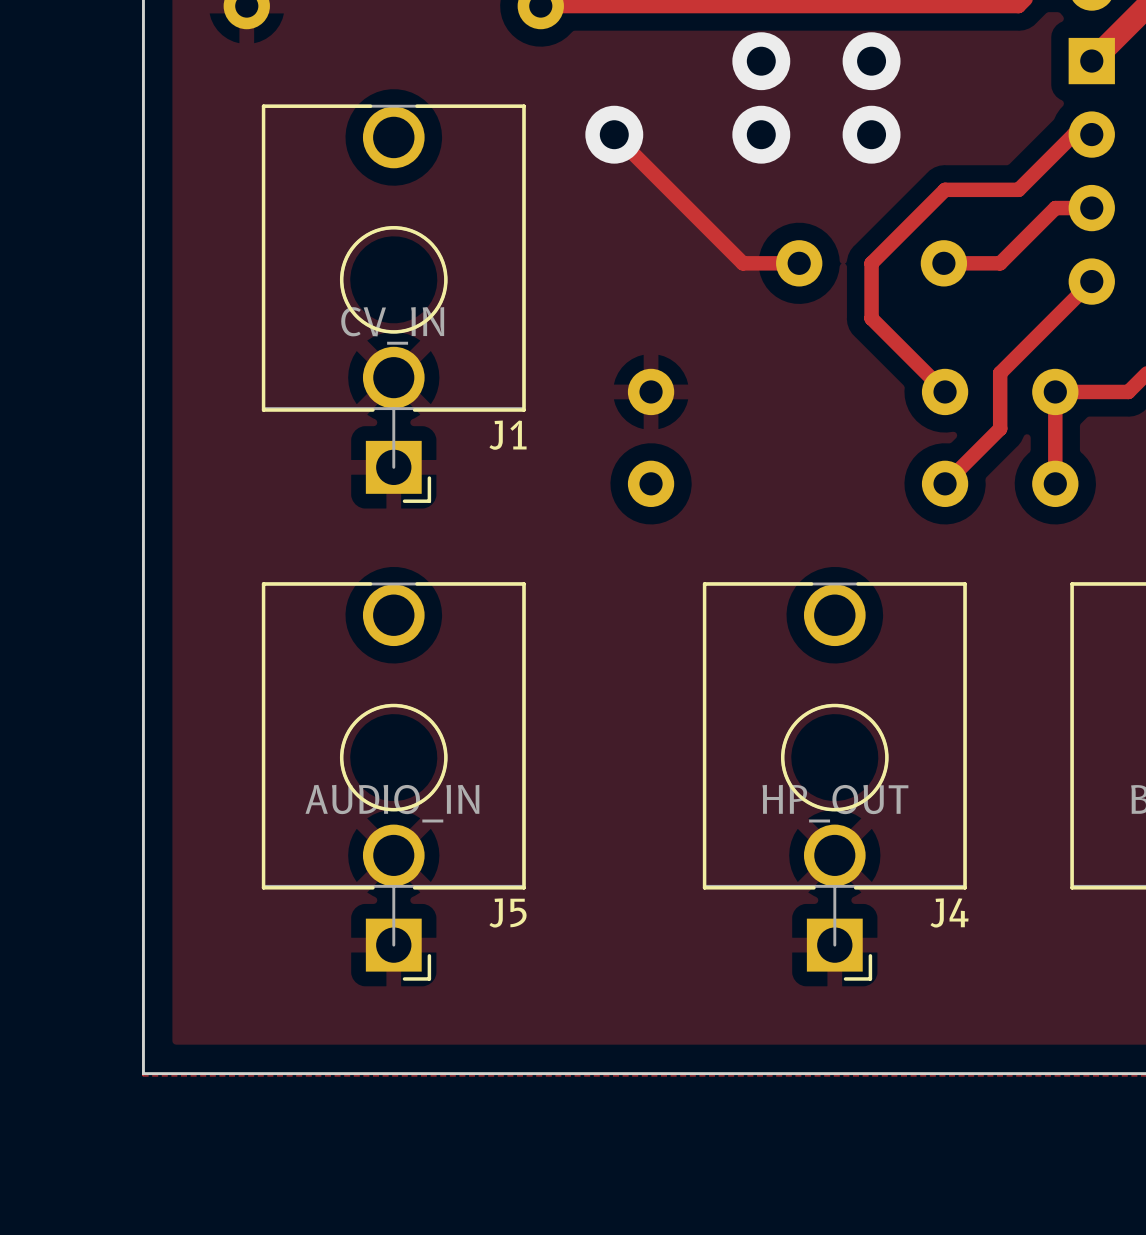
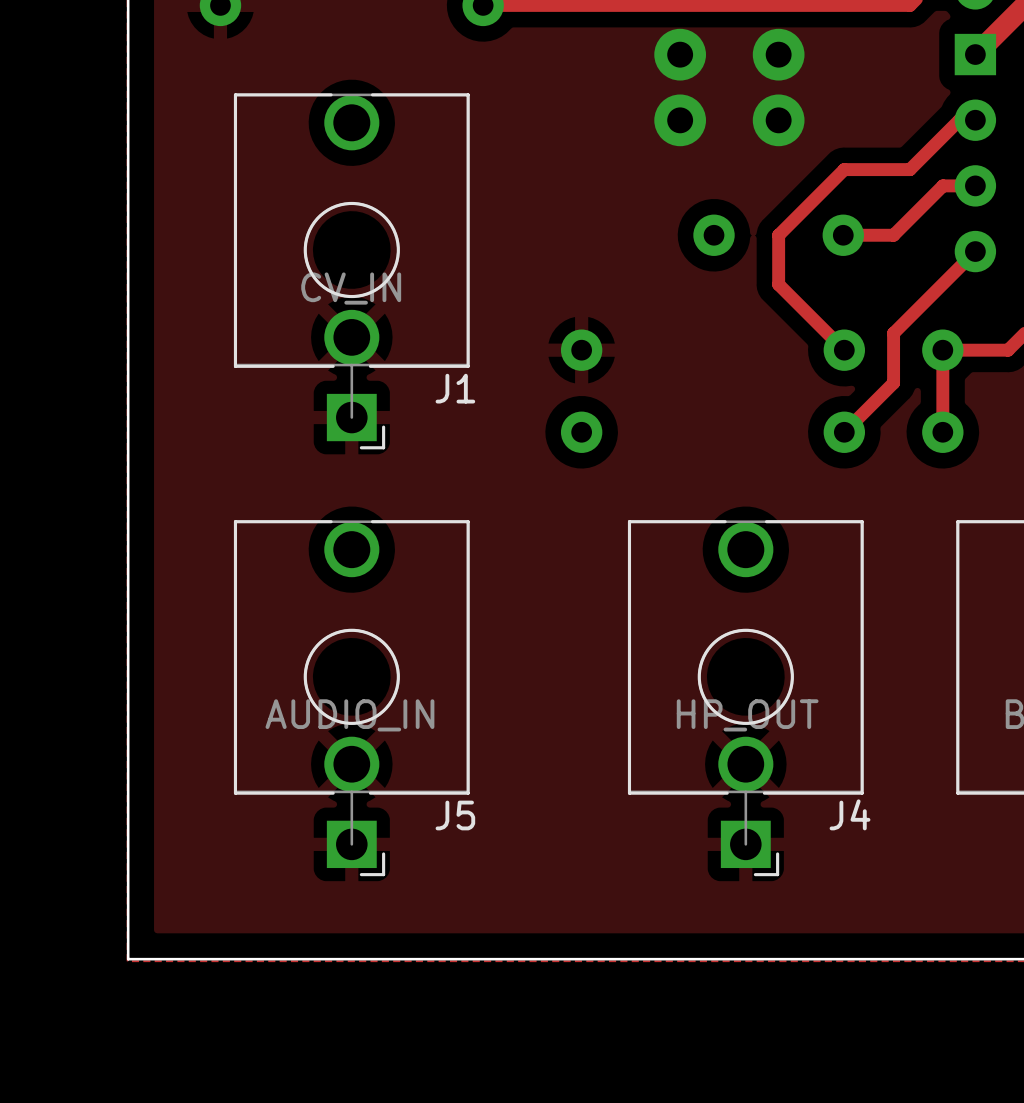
track: (614, 134) (742, 263) (799, 263) -> none
via: (614, 134) -> none

